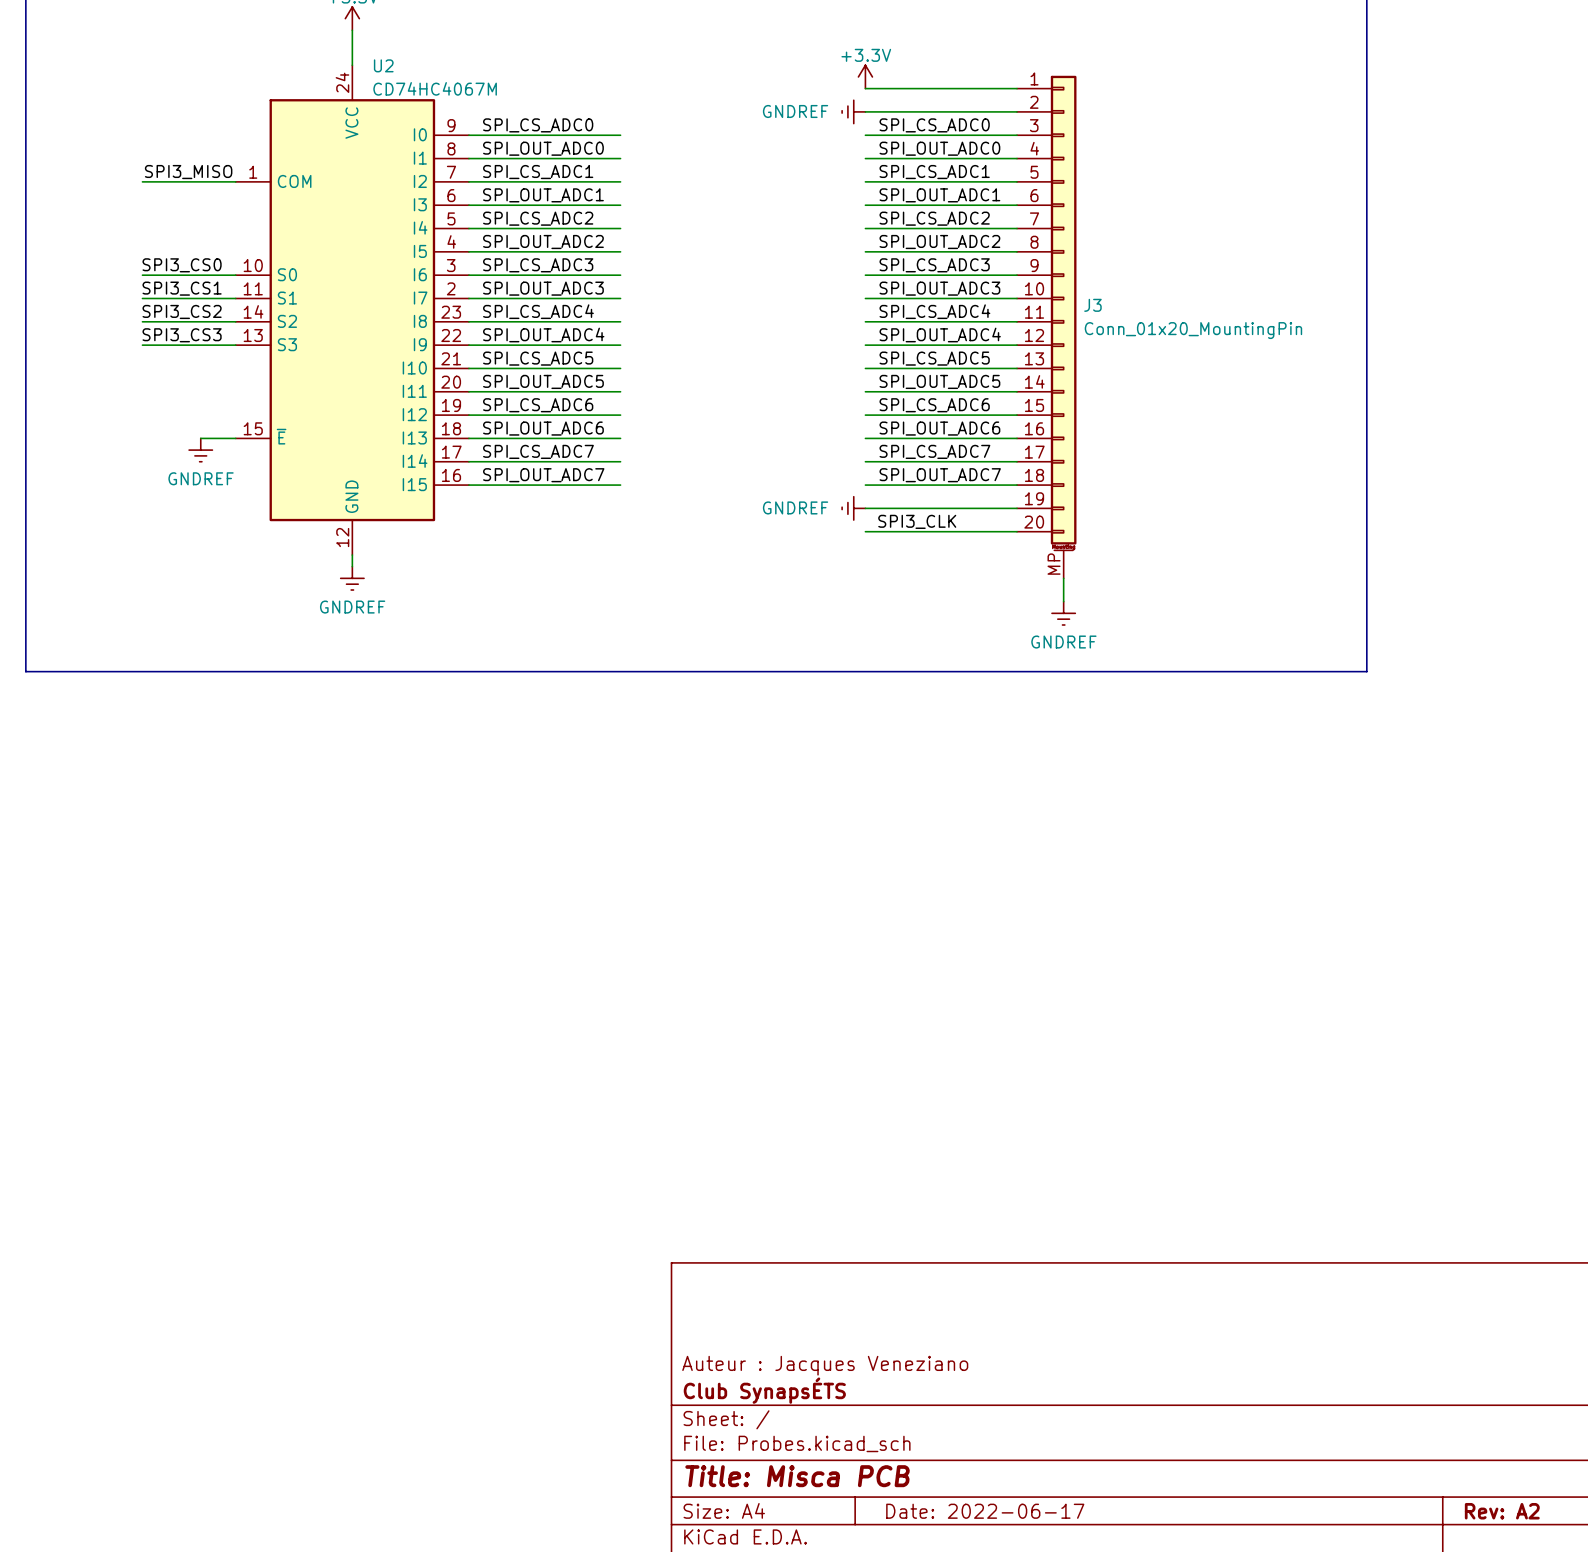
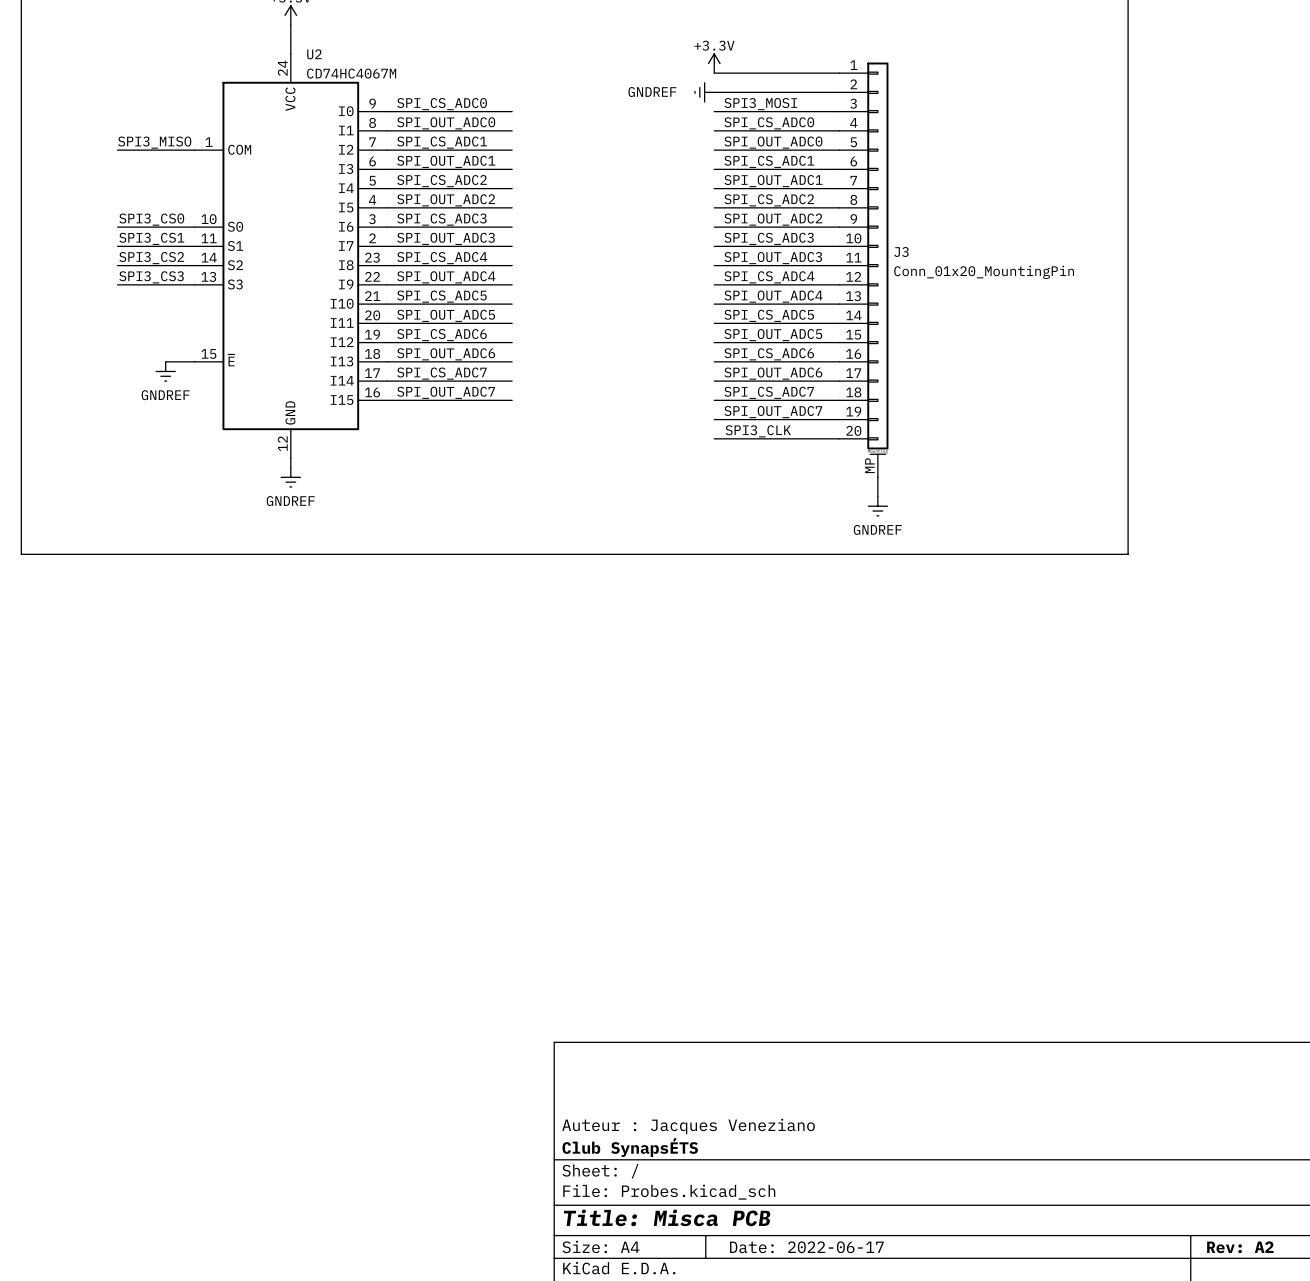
label: SPI_CS_ADC0 (934, 125) -> SPI3_MOSI (760, 104)
label: SPI_OUT_ADC0 (939, 148) -> SPI_CS_ADC0 (769, 123)
label: SPI_CS_ADC1 (934, 172) -> SPI_OUT_ADC0 (773, 142)
label: SPI_OUT_ADC1 (939, 195) -> SPI_CS_ADC1 (769, 161)
label: SPI_CS_ADC2 (934, 218) -> SPI_OUT_ADC1 (773, 181)
label: SPI_OUT_ADC2 (939, 242) -> SPI_CS_ADC2 (769, 200)
label: SPI_CS_ADC3 (934, 265) -> SPI_OUT_ADC2 (773, 219)
label: SPI_OUT_ADC3 (939, 288) -> SPI_CS_ADC3 (769, 238)
label: SPI_CS_ADC4 (934, 311) -> SPI_OUT_ADC3 (773, 258)
label: SPI_OUT_ADC4 (940, 335) -> SPI_CS_ADC4 (769, 277)
label: SPI_CS_ADC5 (934, 358) -> SPI_OUT_ADC4 (773, 296)
label: SPI_OUT_ADC5 (939, 381) -> SPI_CS_ADC5 (769, 315)
label: SPI_CS_ADC6 (934, 405) -> SPI_OUT_ADC5 (773, 335)
label: SPI_OUT_ADC6 (939, 428) -> SPI_CS_ADC6 (769, 354)
label: SPI_CS_ADC7 (934, 451) -> SPI_OUT_ADC6 (773, 373)
label: SPI_OUT_ADC7 (940, 475) -> SPI_CS_ADC7 (769, 392)
label: none -> SPI_OUT_ADC7 (773, 412)
power symbol: GNDREF (853, 508) -> none

